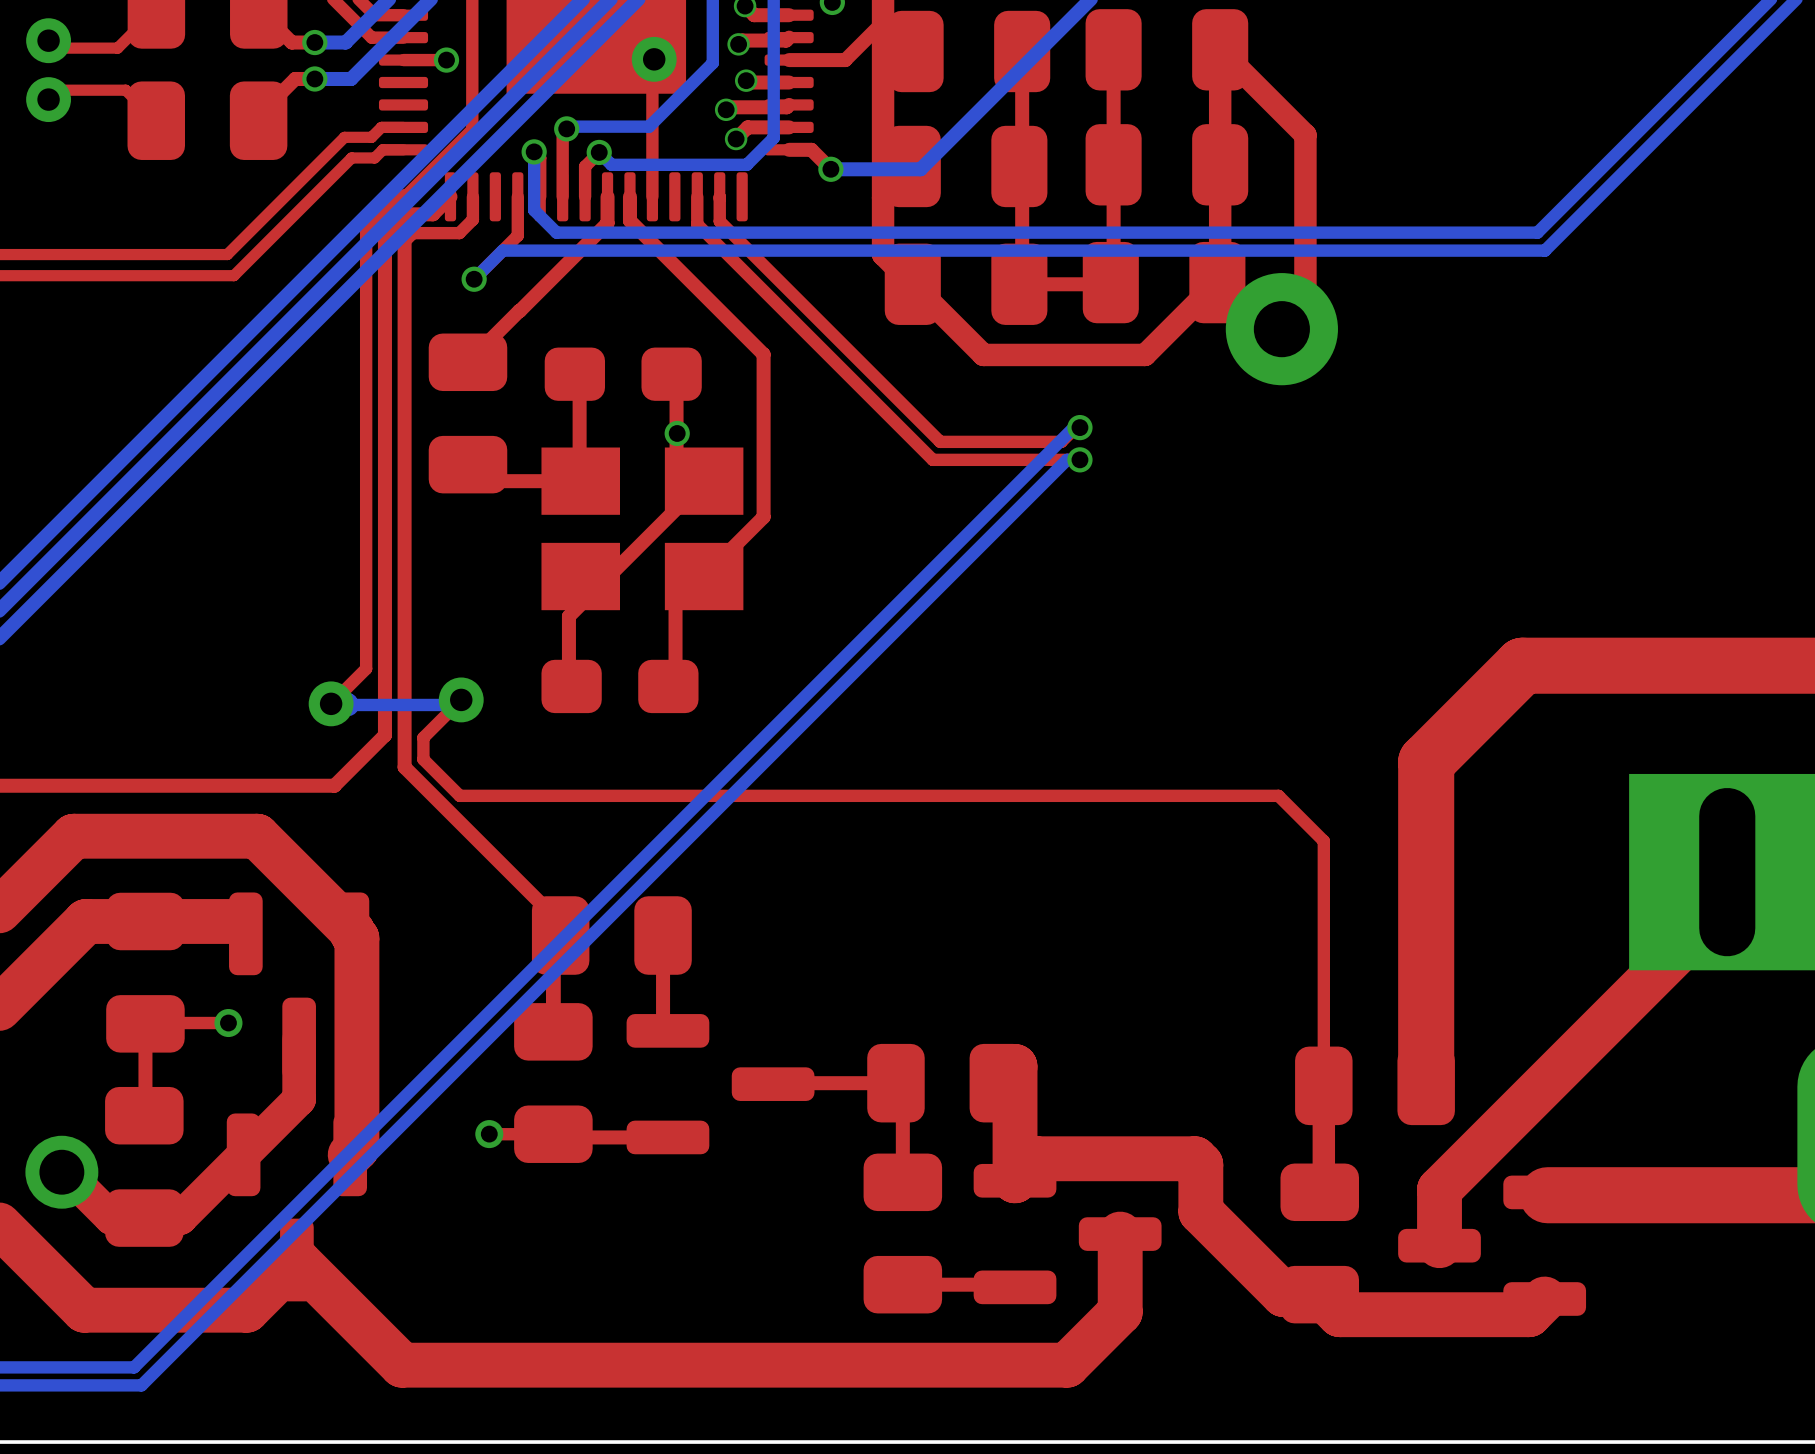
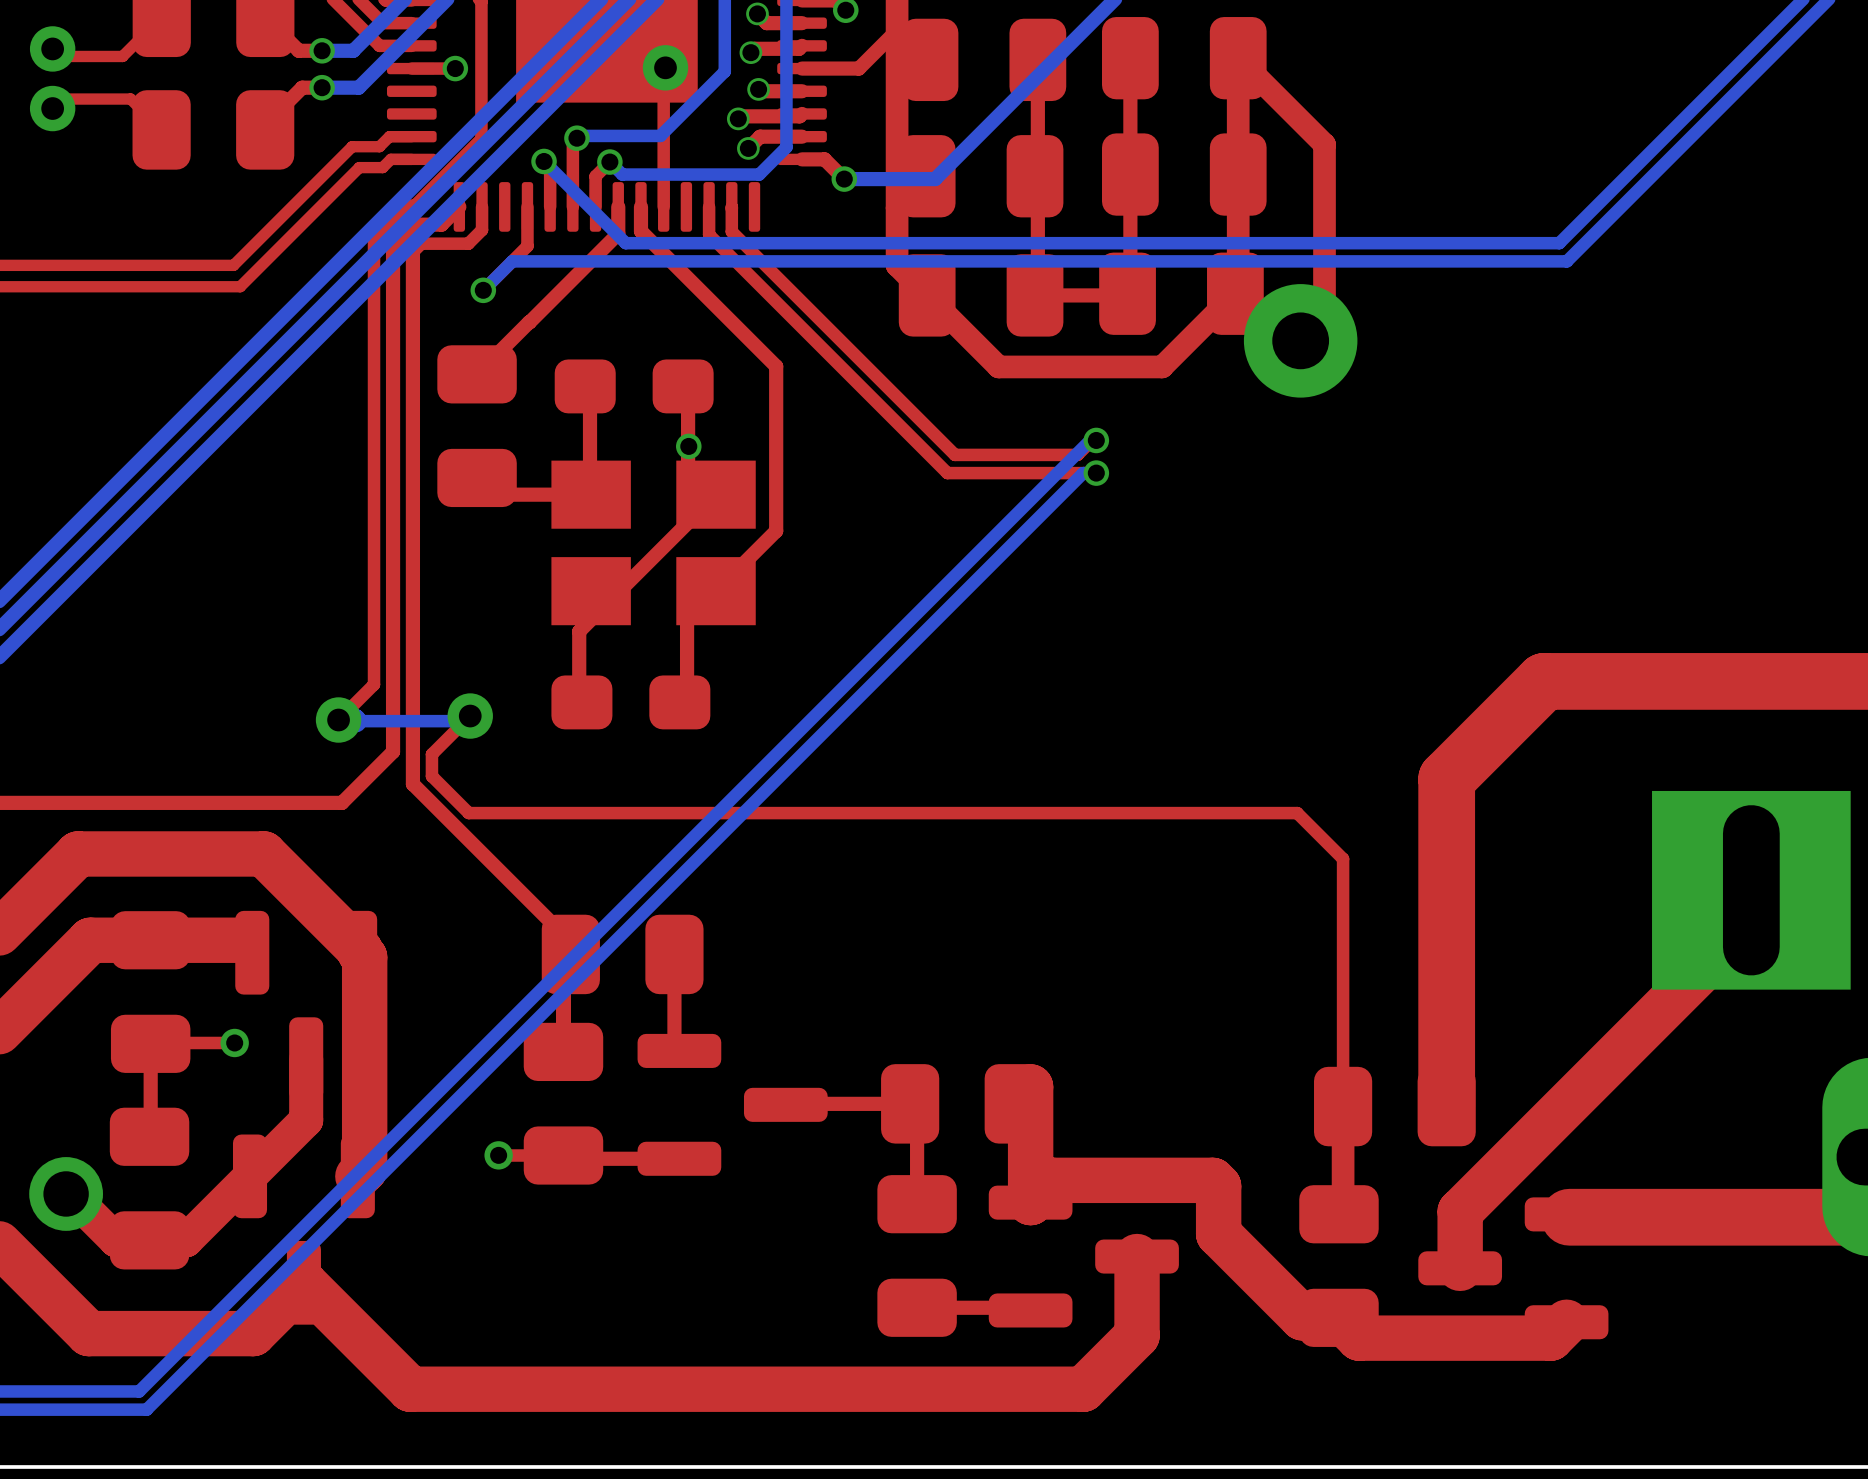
bottom track: (534, 151) (534, 210) (556, 232) (614, 232) -> (544, 161) (625, 243)

